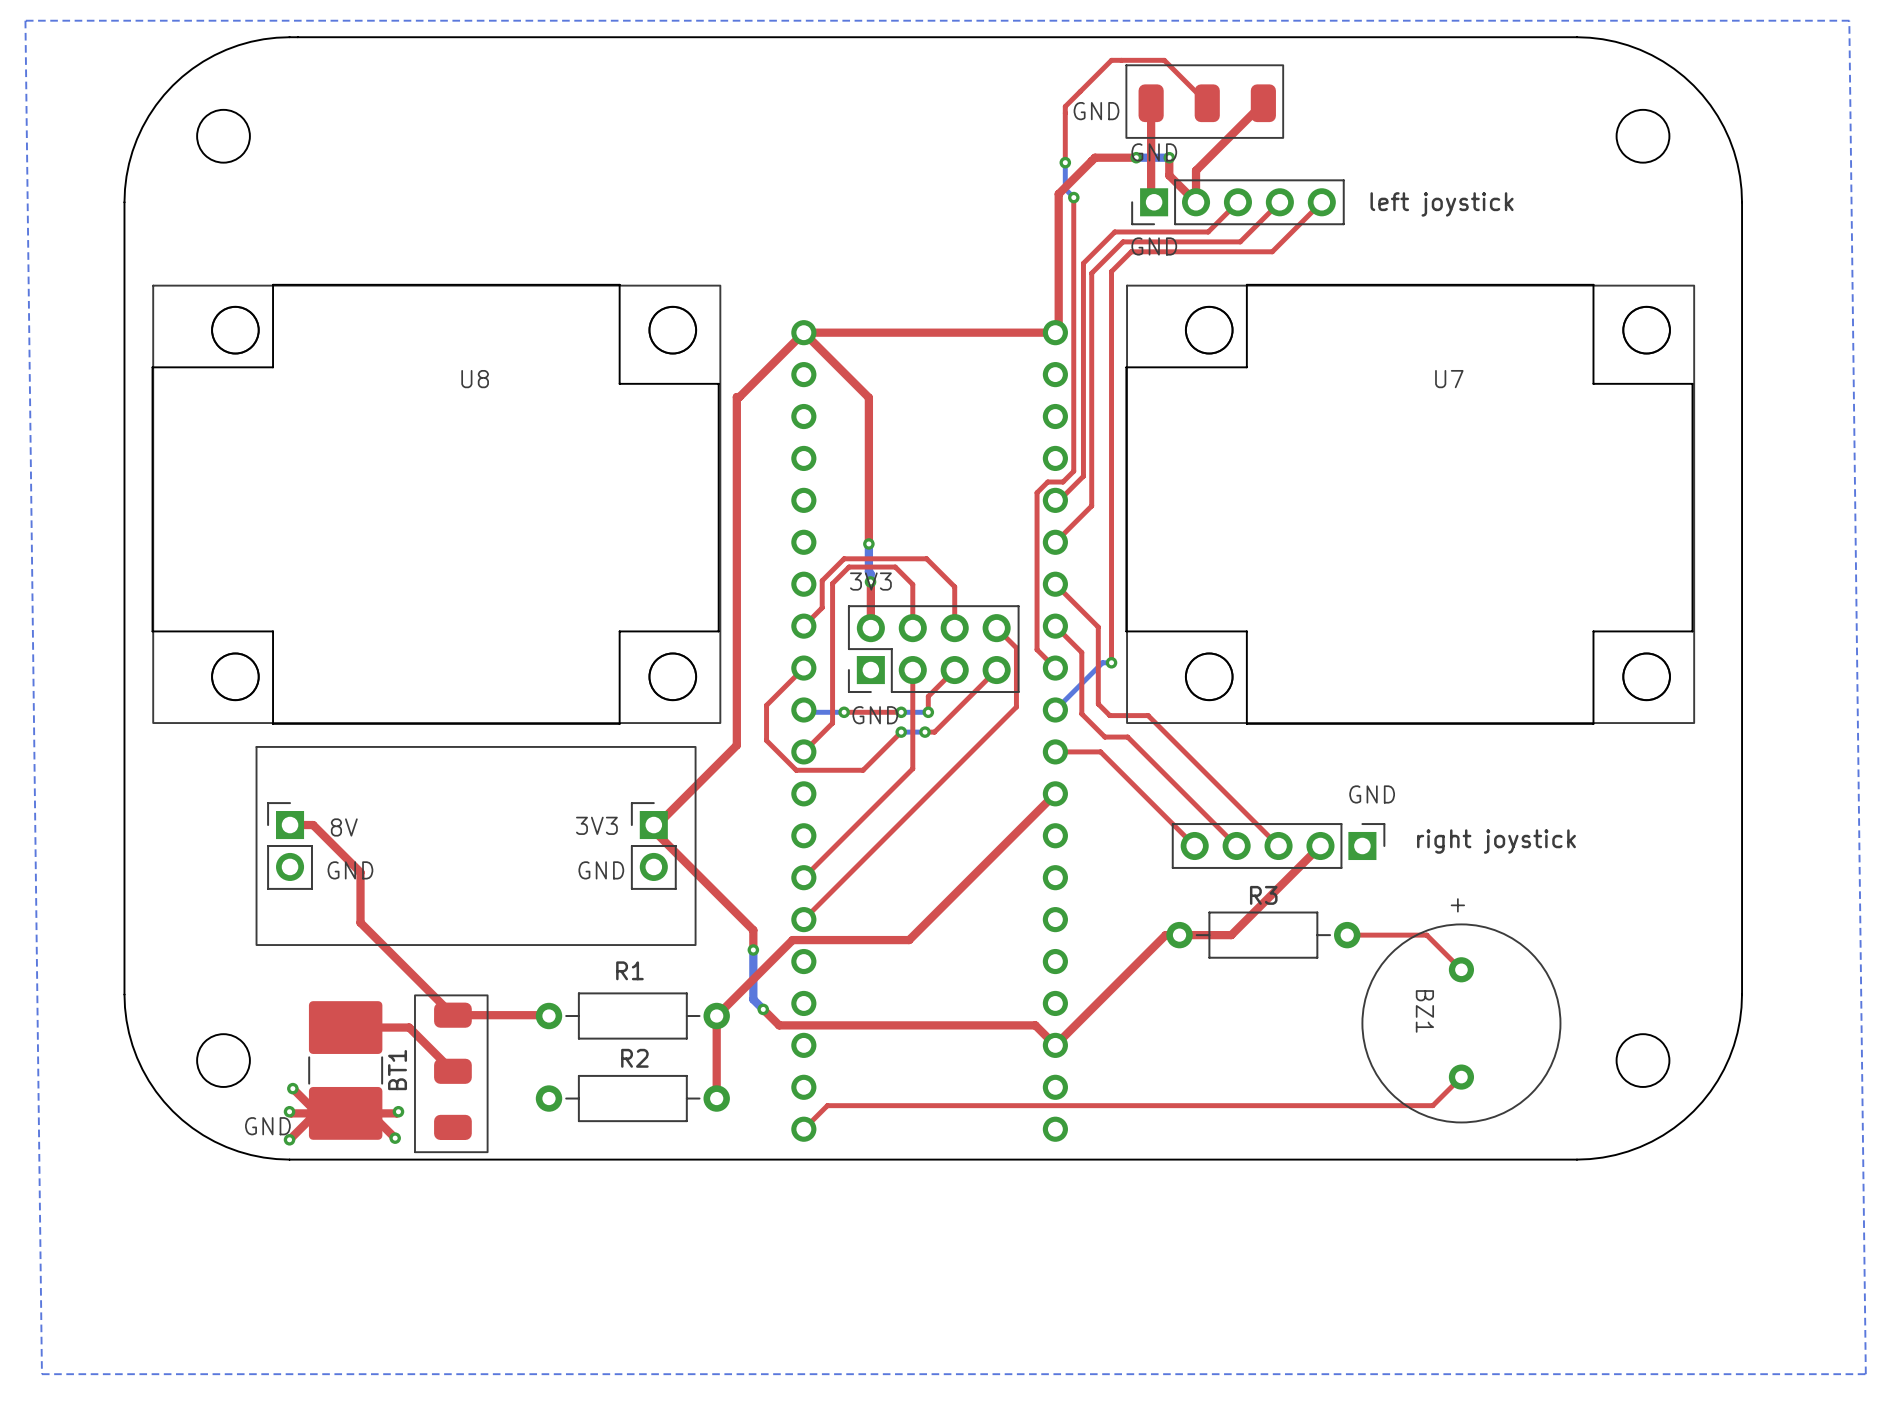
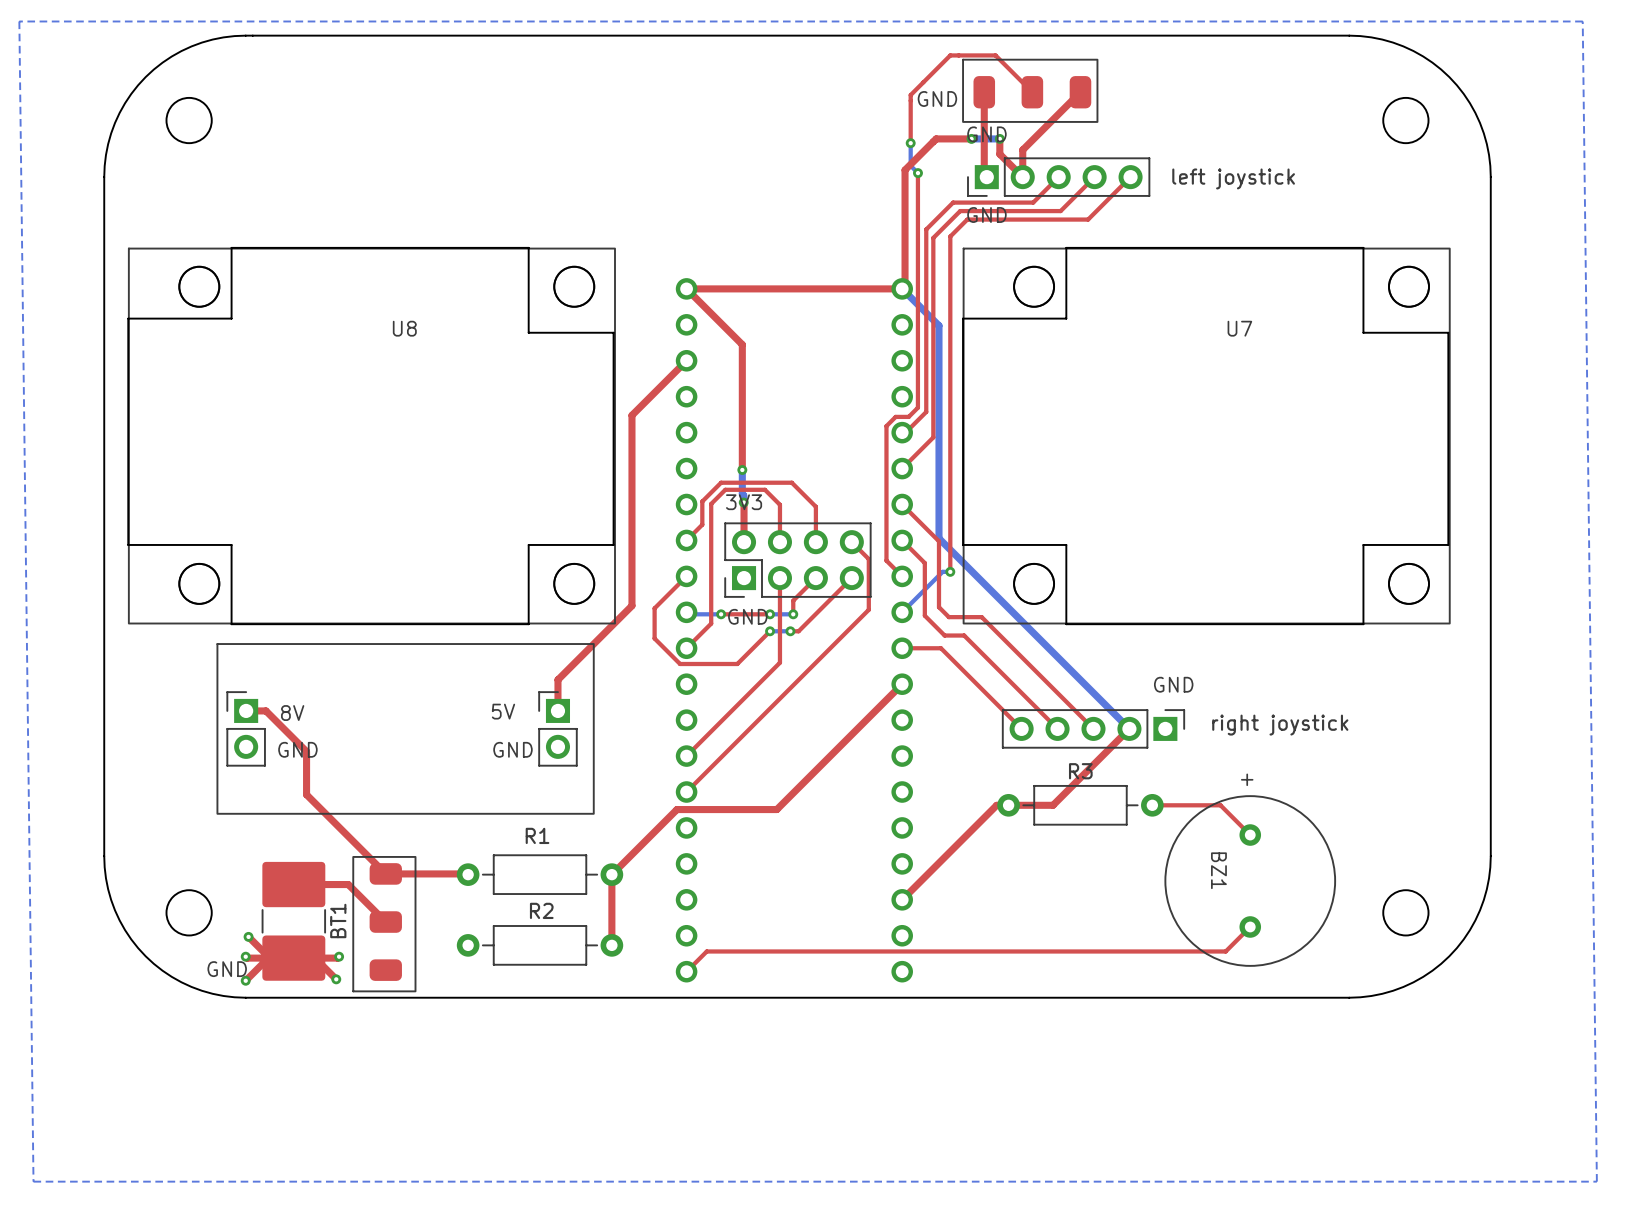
top track: (803, 332) (739, 397) (736, 397) (736, 745) (657, 825) -> none
bottom track: none -> (902, 288) (938, 325) (938, 538) (1129, 728)
top track: none -> (686, 360) (631, 415) (631, 605) (557, 679) (557, 710)
text: 3V3 (596, 825) -> 5V (503, 711)
top track: (653, 830) (753, 930) (753, 949) -> none
bottom track: (753, 949) (753, 999) (763, 1009) -> none
via: (753, 949) -> none
top track: (763, 1009) (779, 1025) (1035, 1025) (1055, 1045) -> none
via: (763, 1009) -> none

